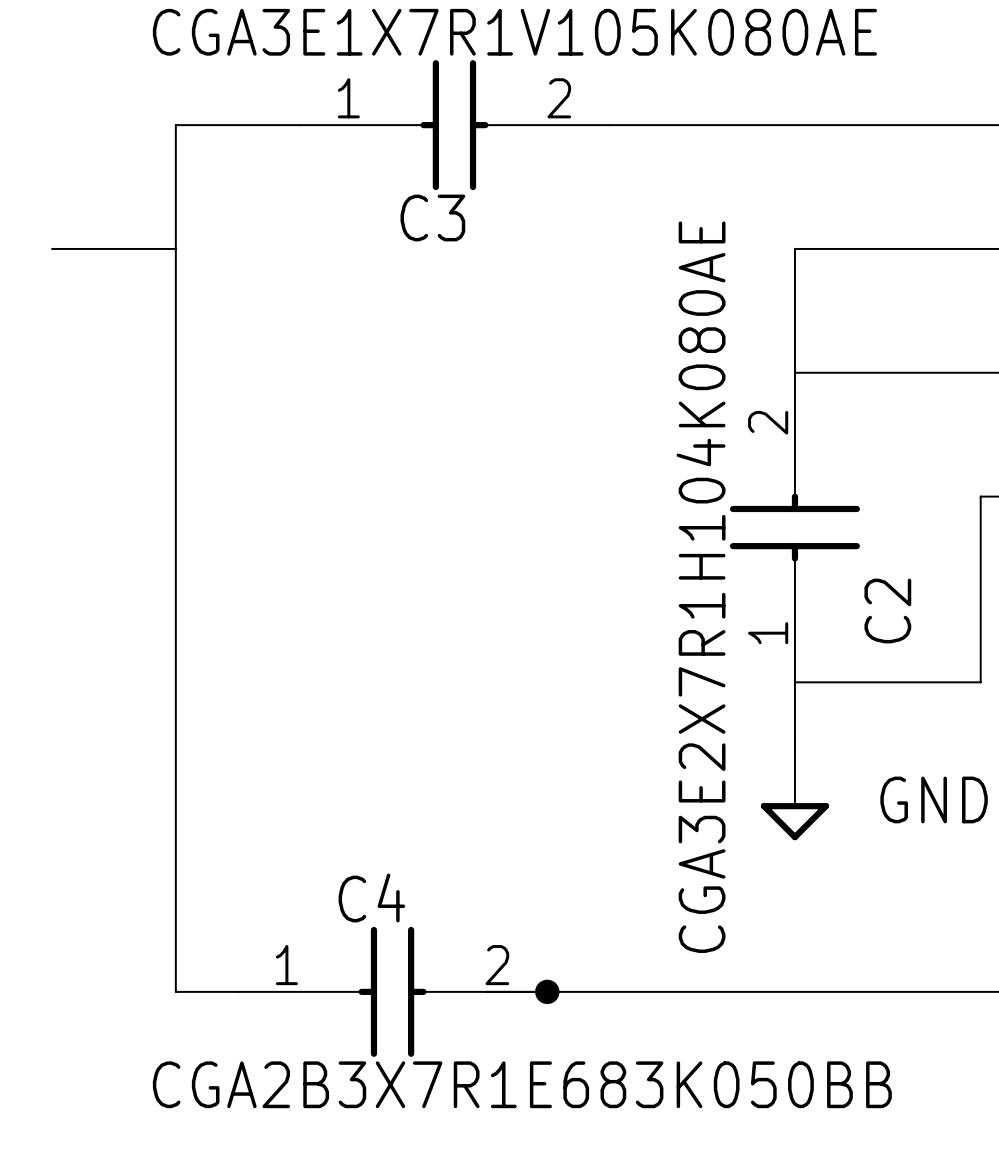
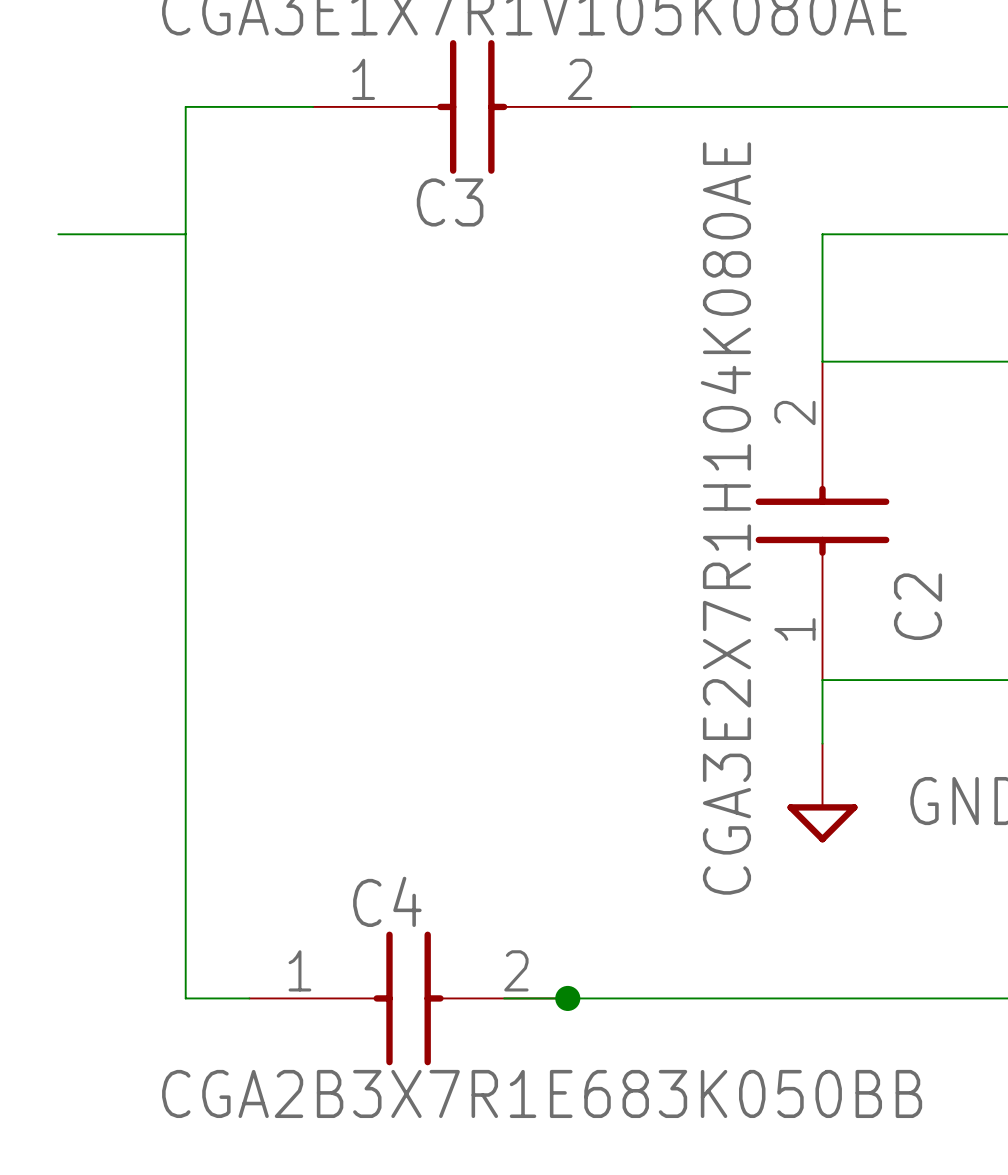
C2 value position: CGA3E2X7R1H104K080AE (701, 587) -> CGA3E2X7R1H104K080AE (725, 518)

